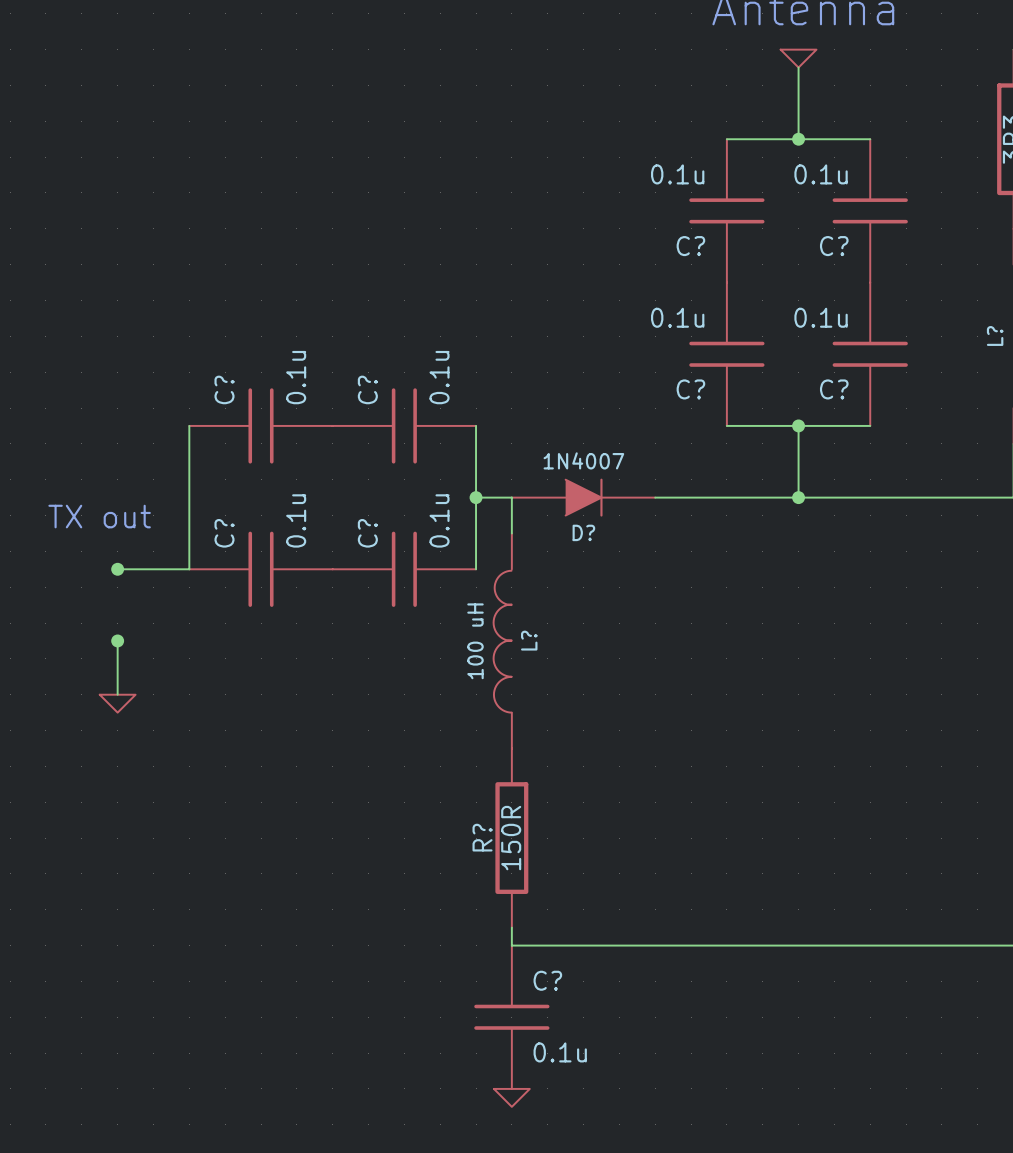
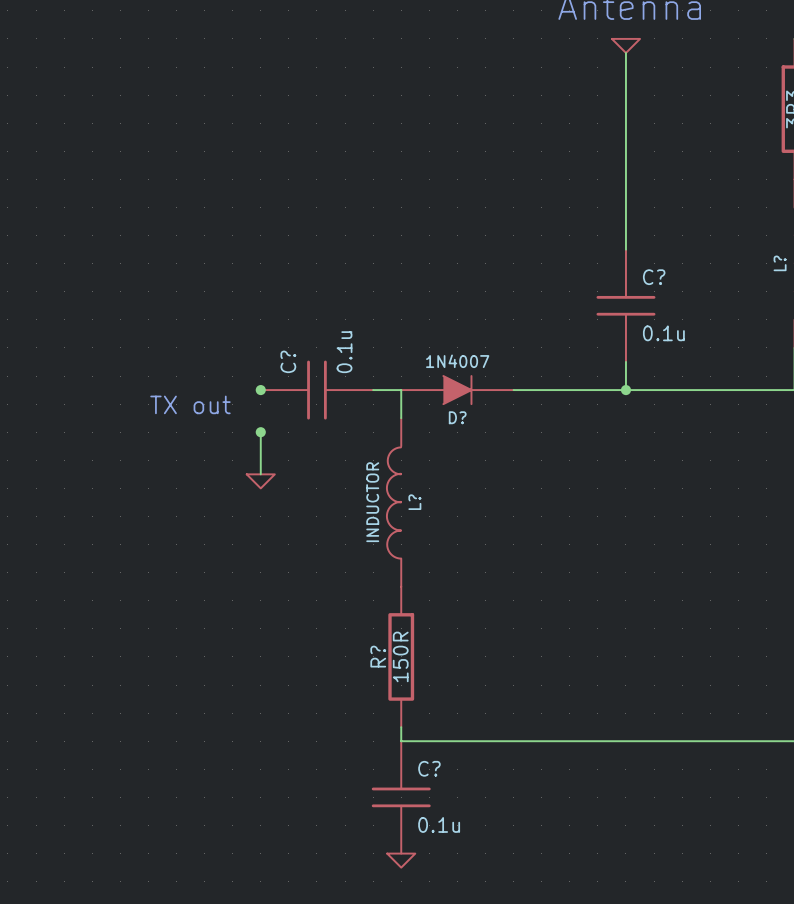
wire: (726, 139) (870, 139) -> none
wire: none -> (625, 109) (625, 249)
junction: (798, 139) -> none
C?: 0.1u (726, 210) -> none
C?: 0.1u (870, 210) -> none
C?: 0.1u (726, 354) -> none
C?: 0.1u (870, 354) -> none
C?: none -> 0.1u (625, 305)
wire: (189, 425) (189, 569) (117, 569) -> none
C?: 0.1u (261, 425) -> none
C?: 0.1u (404, 425) -> none
wire: (476, 425) (476, 569) -> none
wire: (726, 425) (870, 425) -> none
junction: (798, 425) -> none
junction: none -> (260, 390)
C?: none -> 0.1u (316, 390)
junction: (476, 497) -> none
text position: TX out (99, 516) -> TX out (190, 404)
junction: none -> (260, 432)
junction: (117, 569) -> none
C?: 0.1u (261, 569) -> none
C?: 0.1u (404, 569) -> none
wire: (117, 640) (117, 694) -> (260, 432) (260, 474)
junction: (117, 640) -> none
L? value: 100 uH (475, 641) -> INDUCTOR (372, 502)
power symbol position: (117, 703) -> (260, 481)

